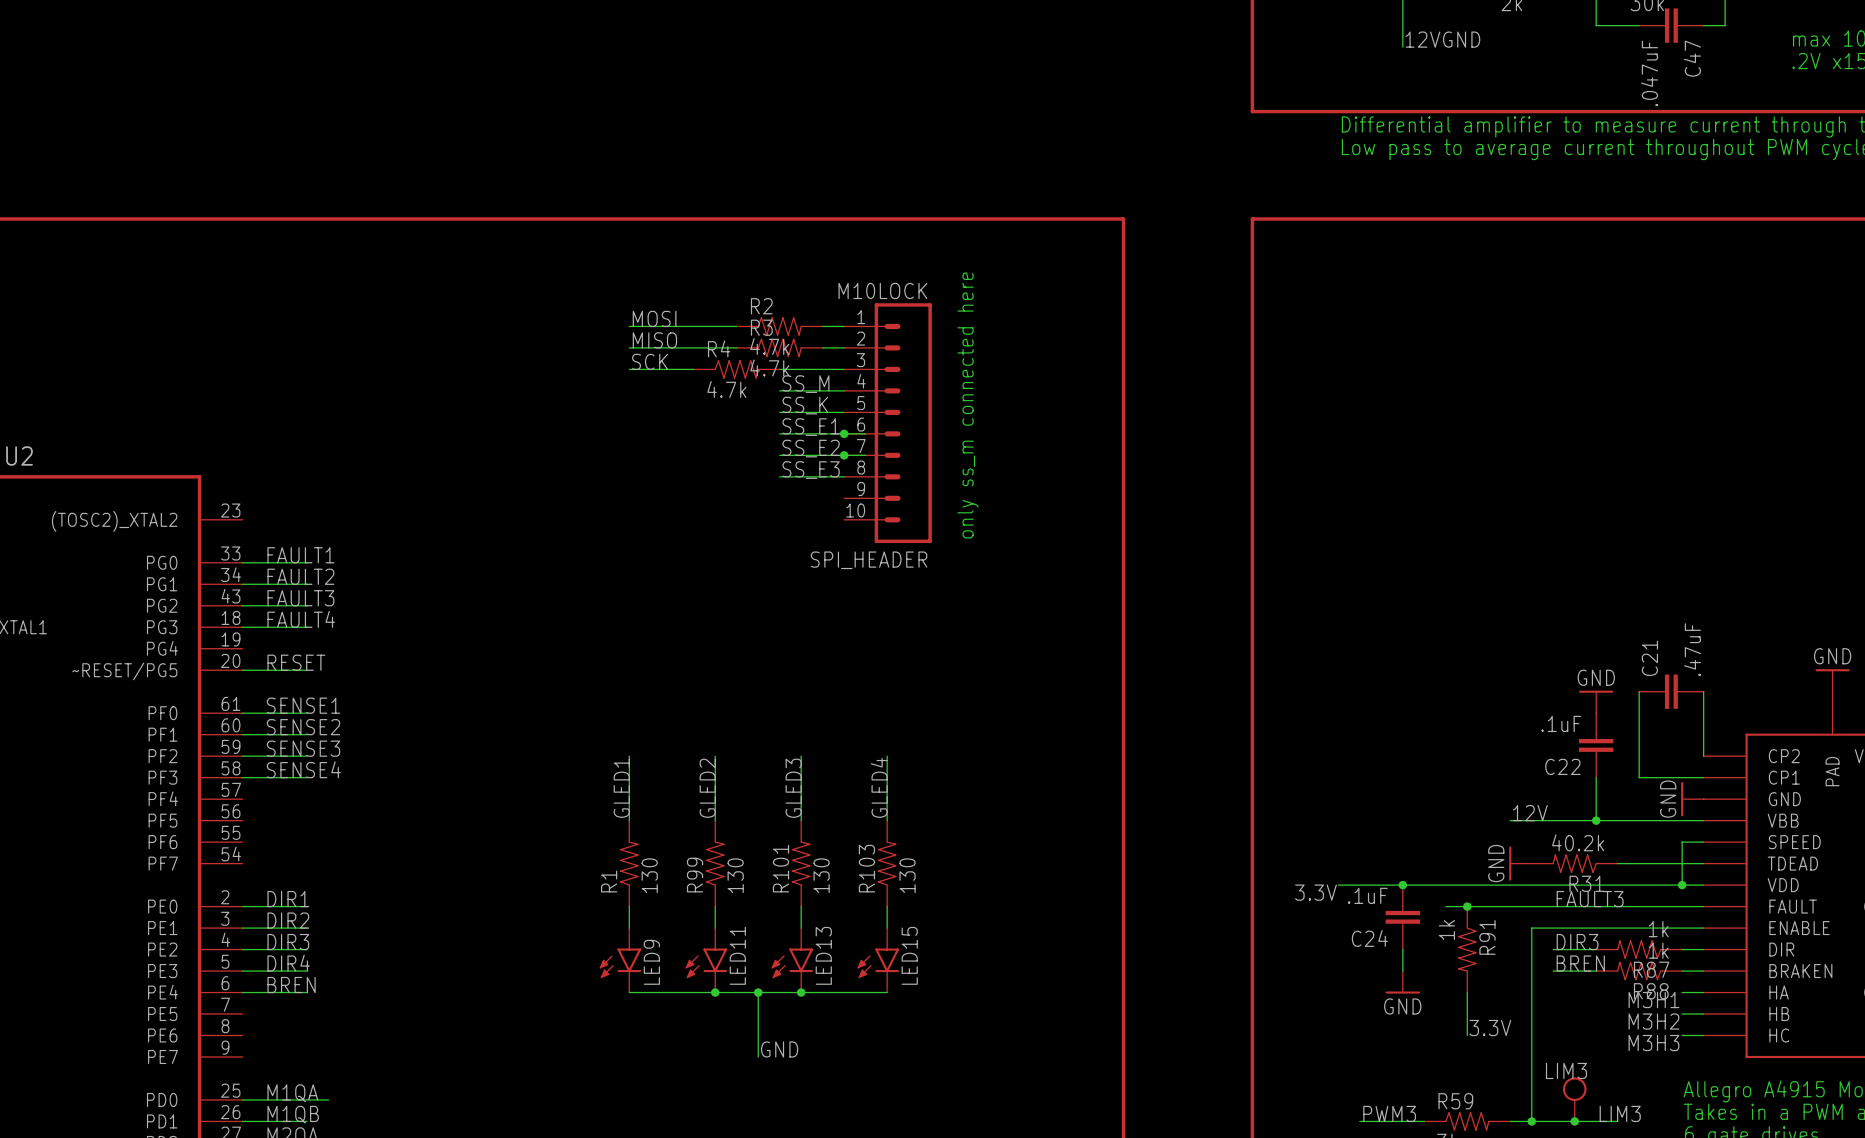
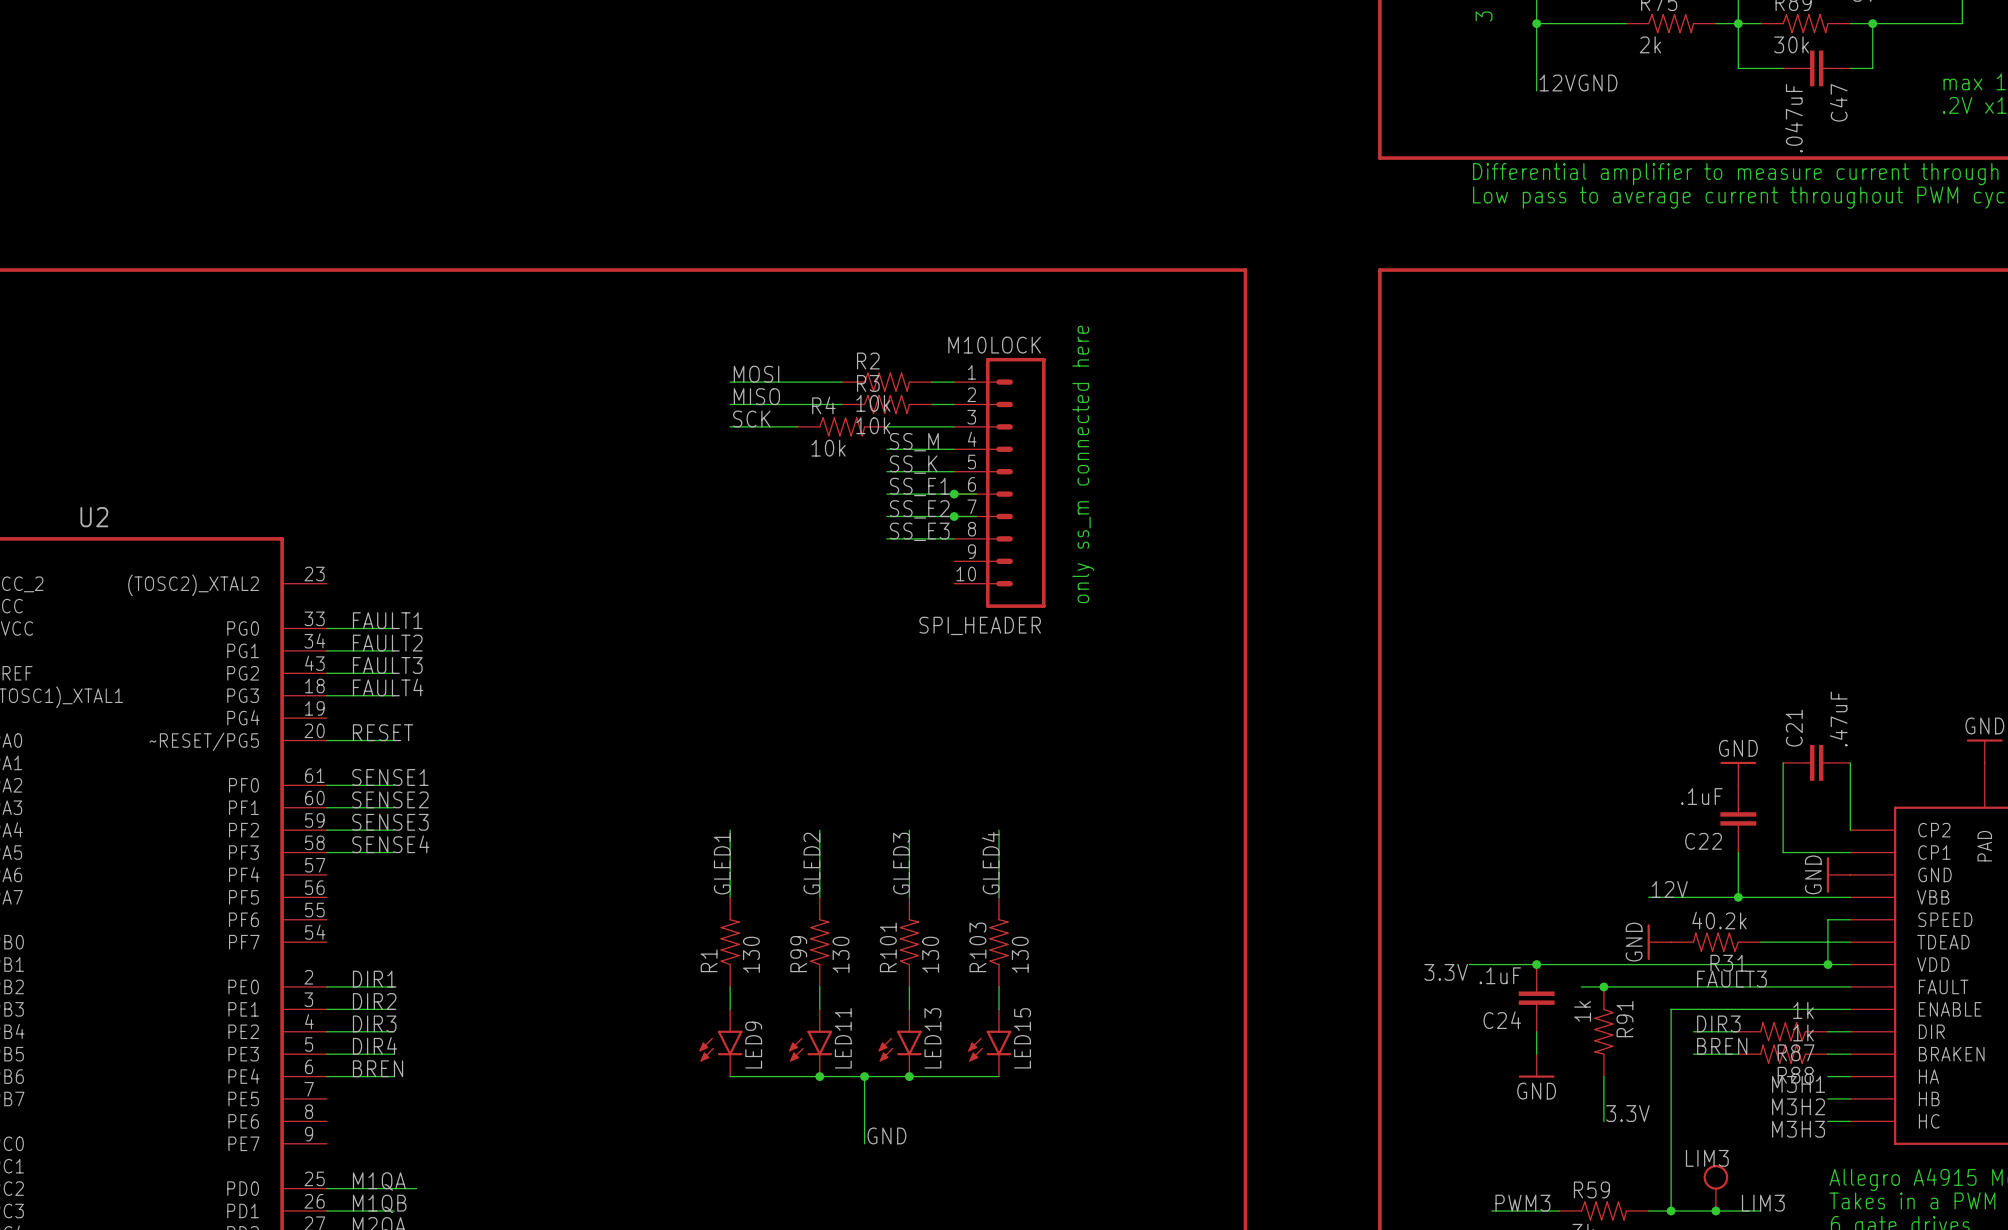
R2 value: 4.7k (769, 346) -> 10k (873, 403)
R3 value: 4.7k (769, 367) -> 10k (873, 425)
R4 value: 4.7k (726, 389) -> 10k (828, 448)

